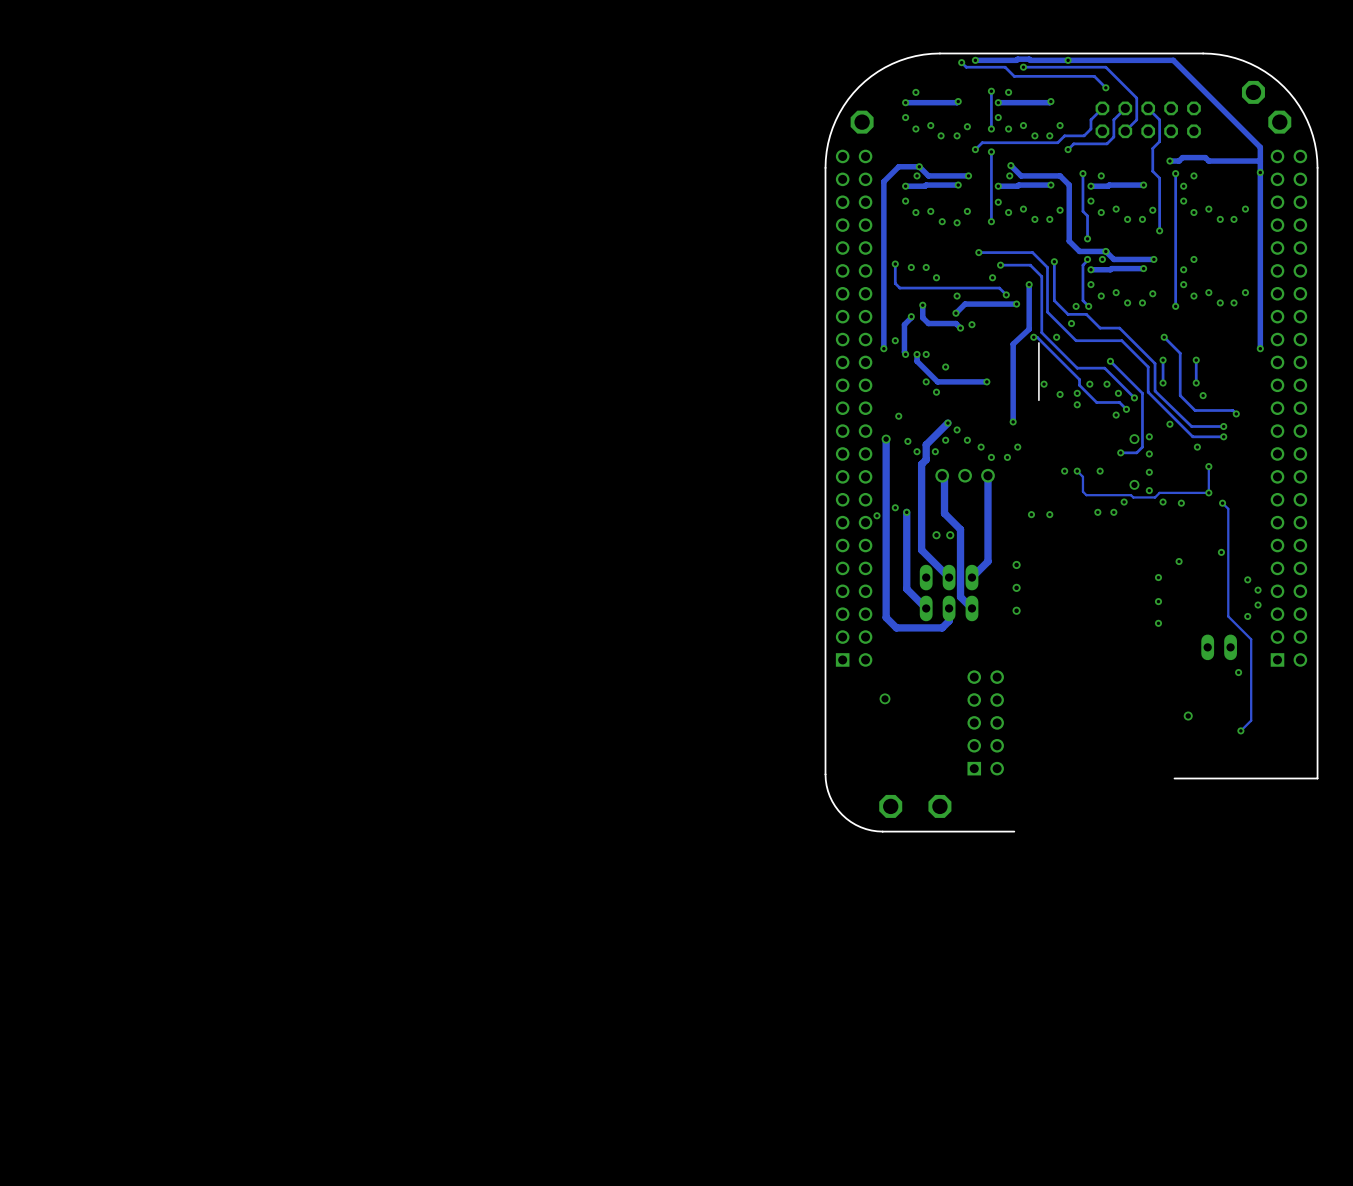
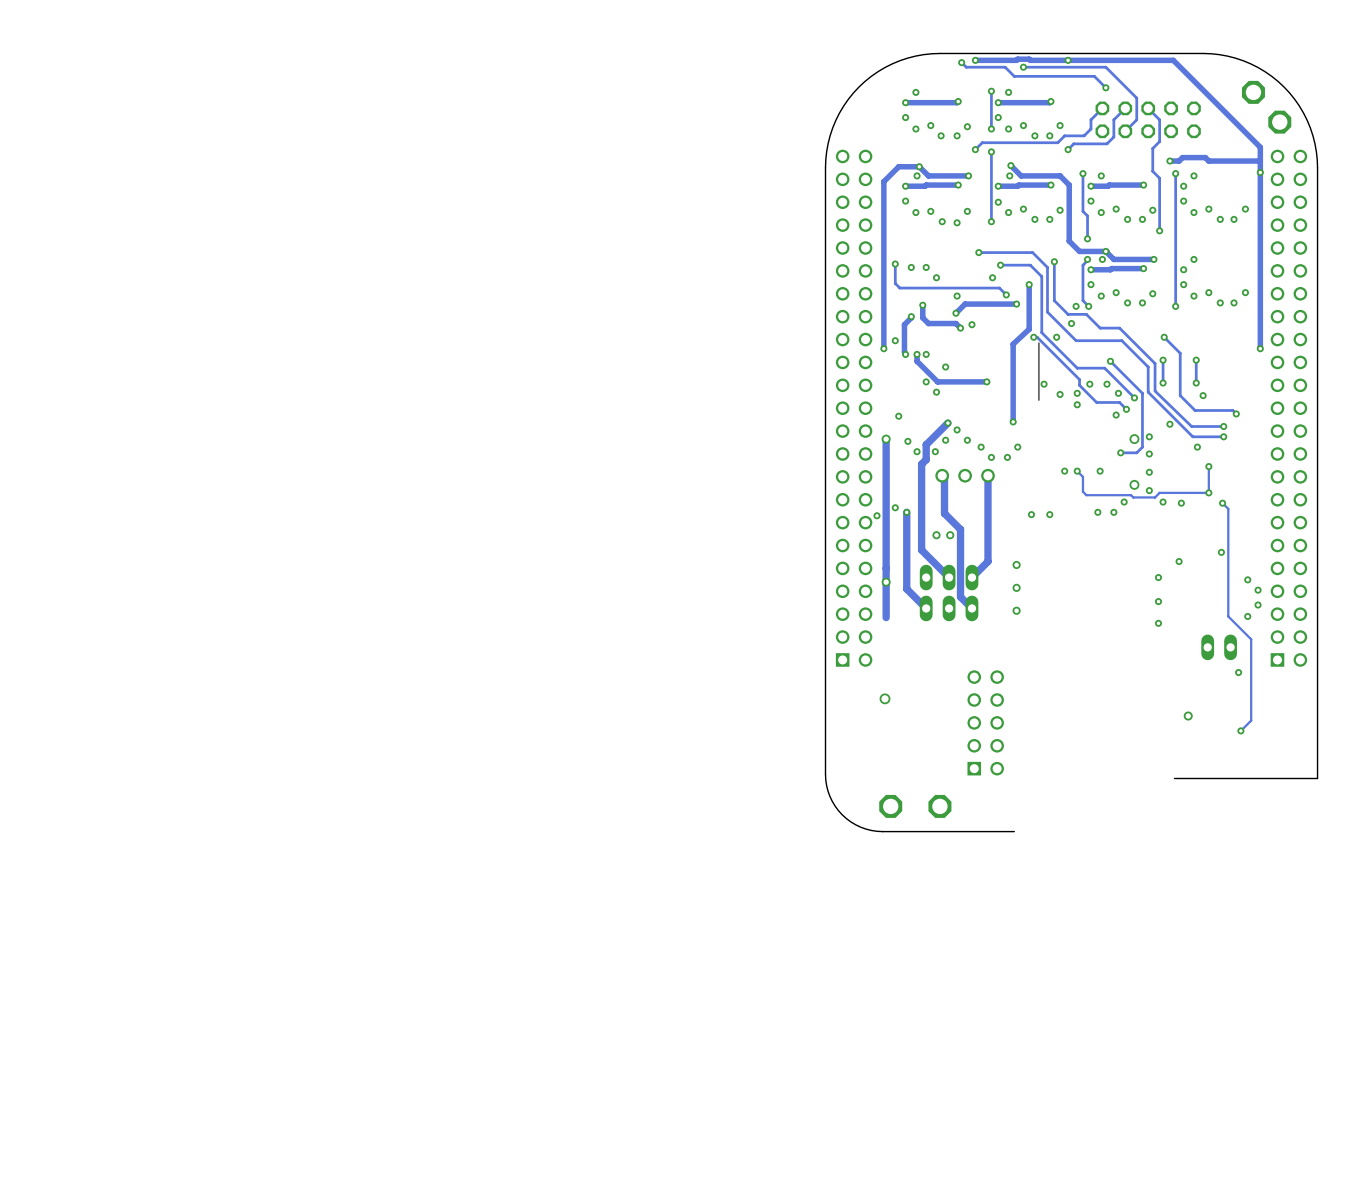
part: (862, 122) -> none
via: none -> (886, 582)
track: (949, 608) (949, 621) (942, 627) (896, 627) (886, 617) -> none

